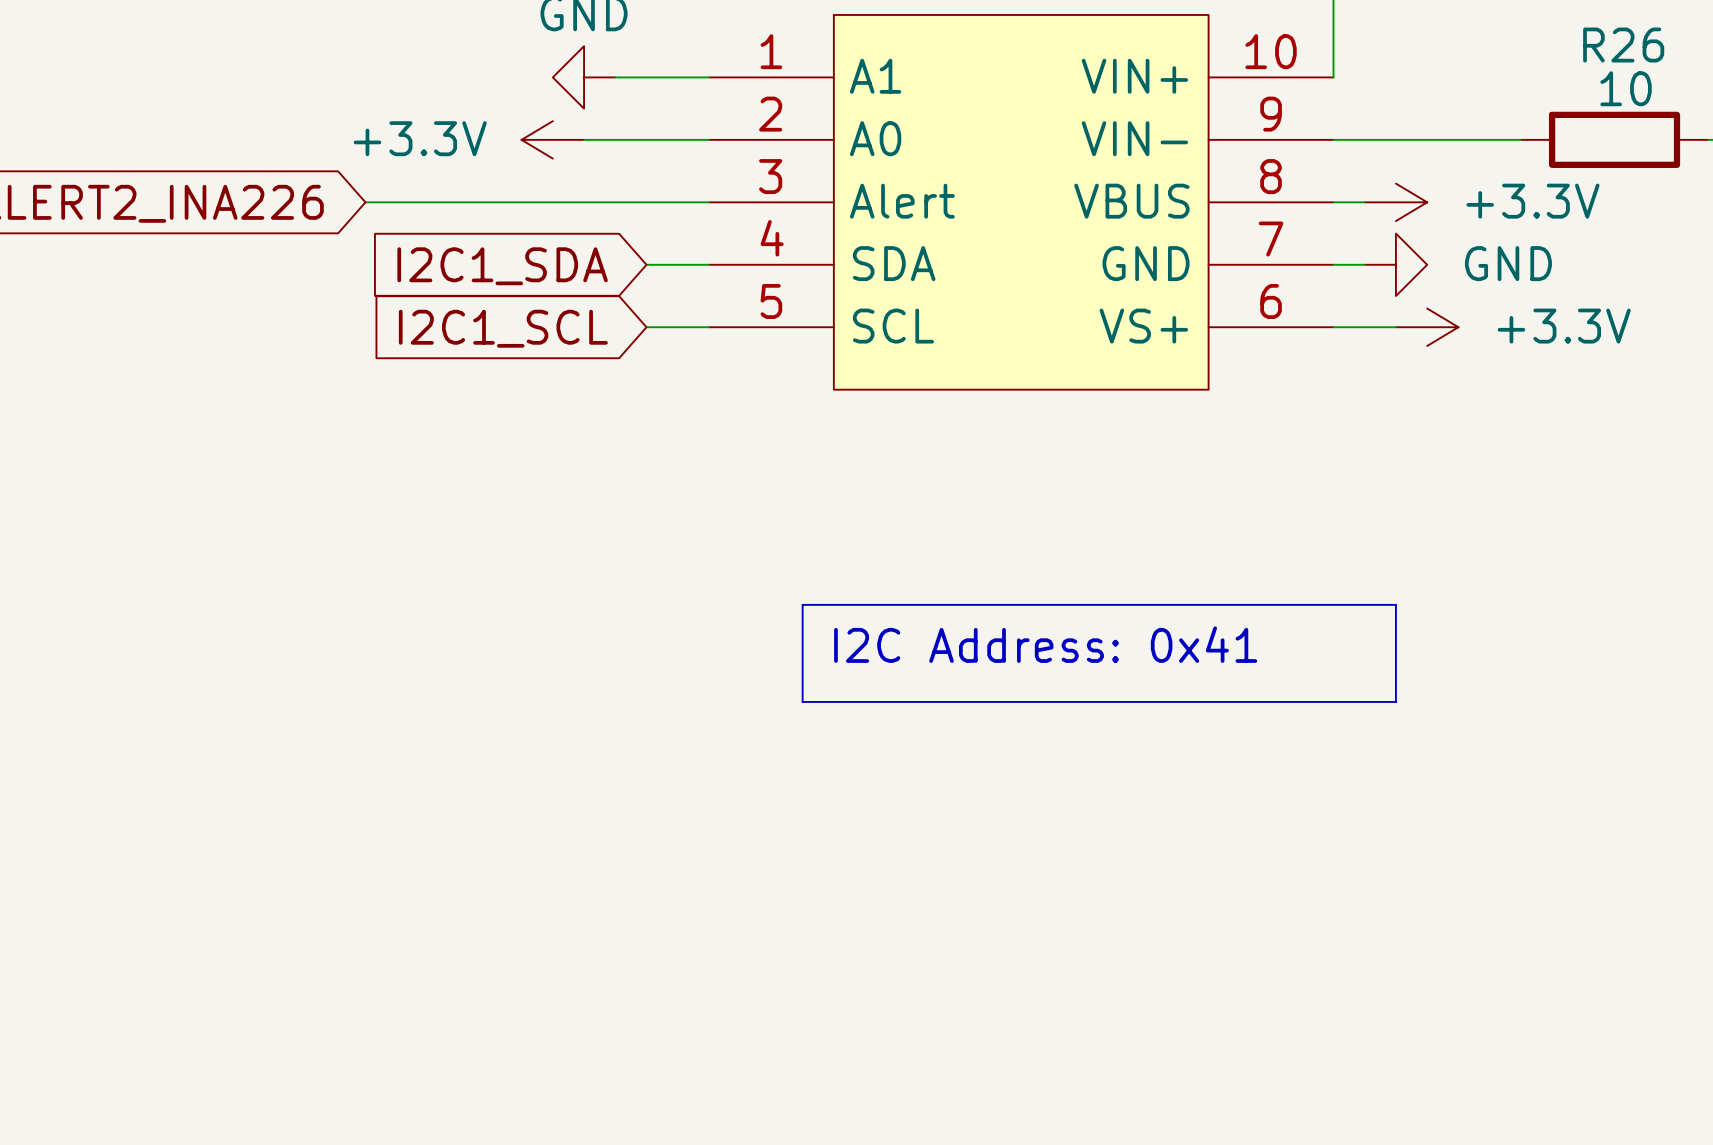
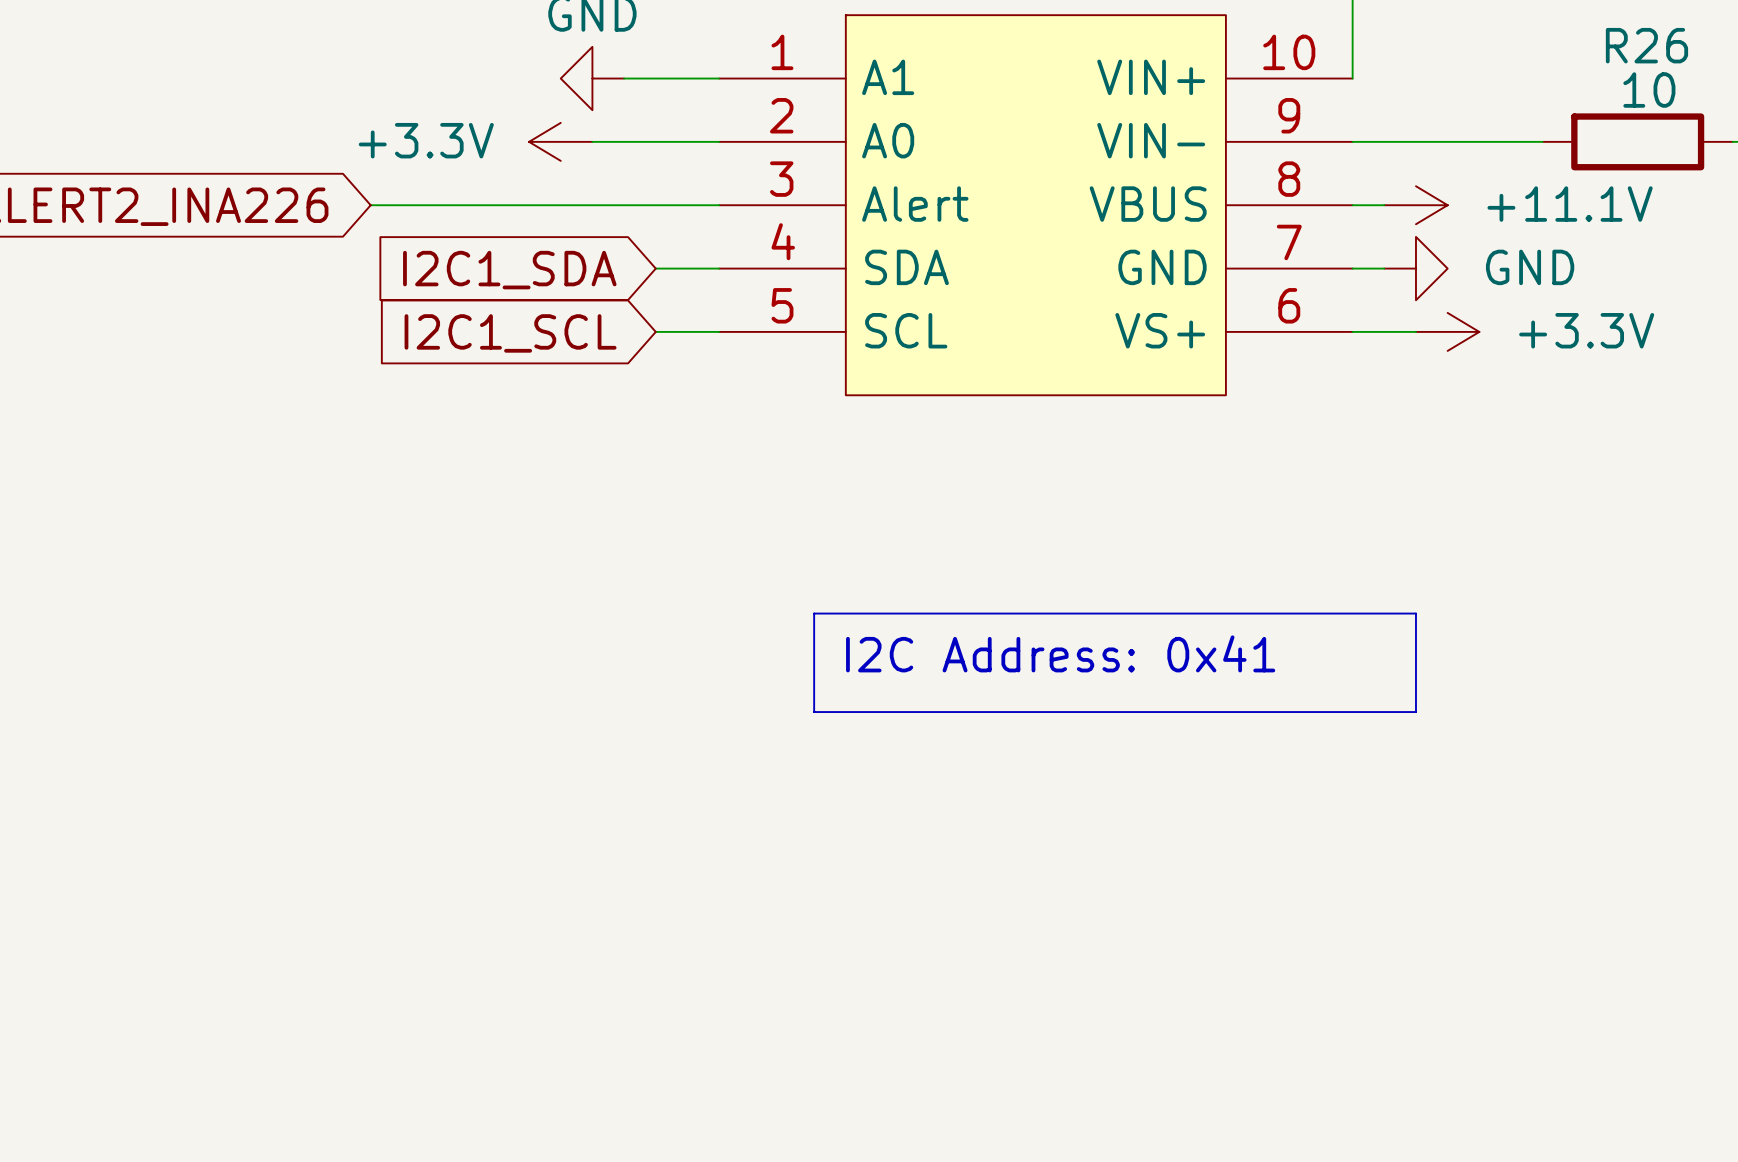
power symbol: +3.3V (1395, 202) -> +11.1V (1415, 205)

